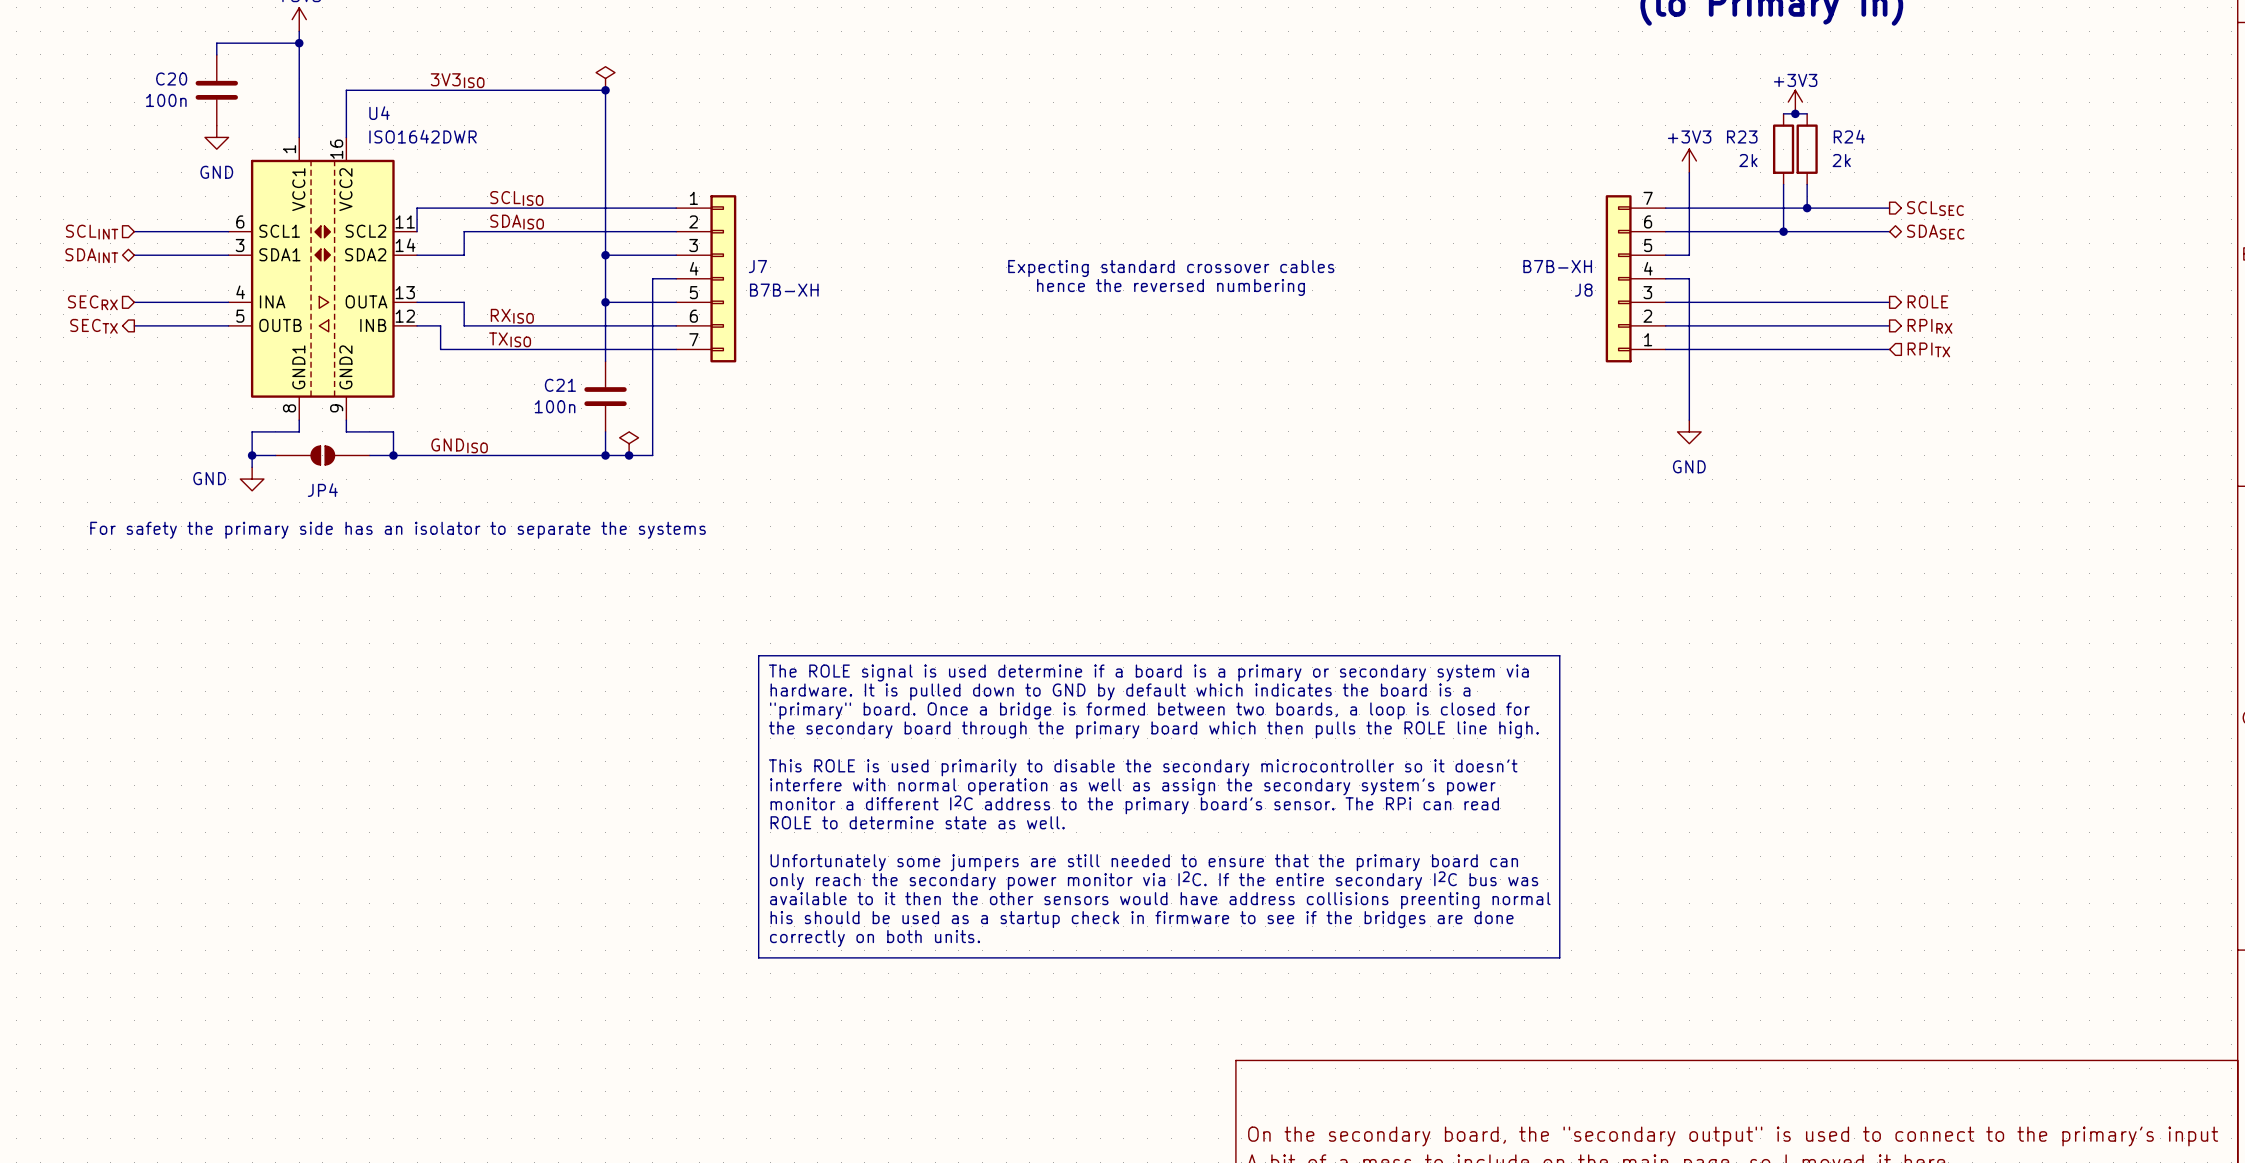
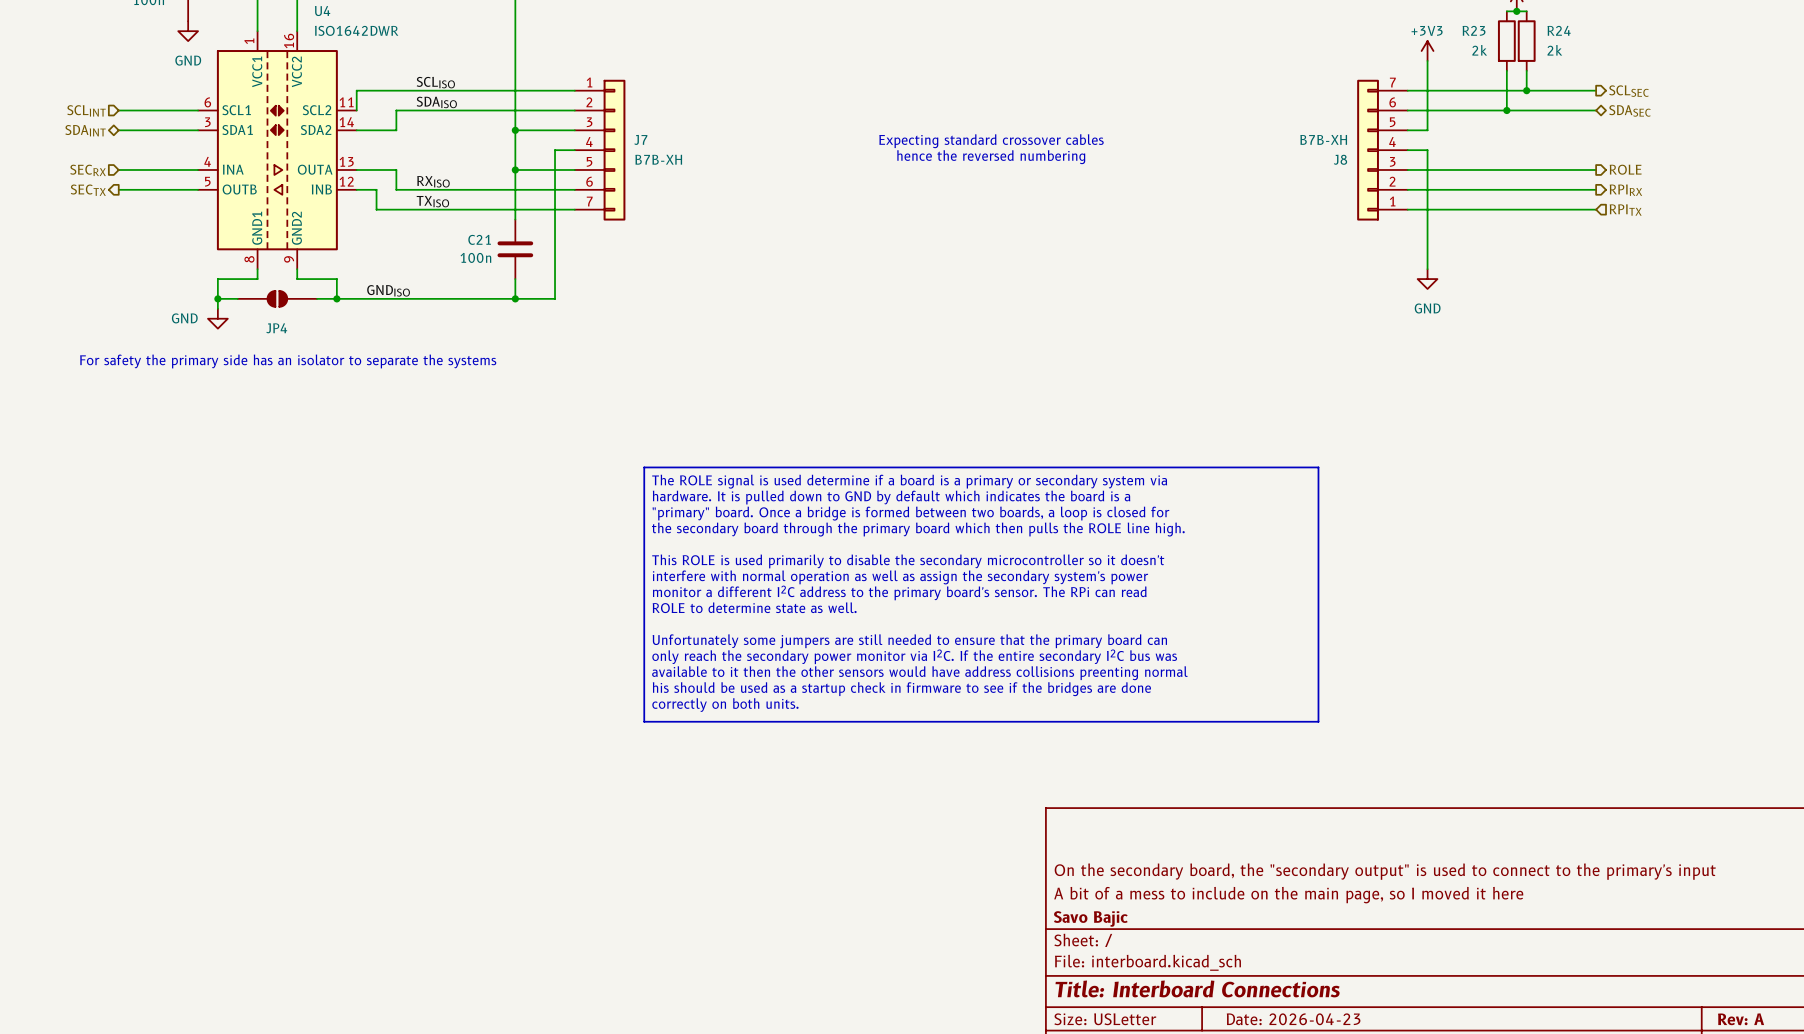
power symbol: (629, 443) -> none
junction: (629, 455) -> none

